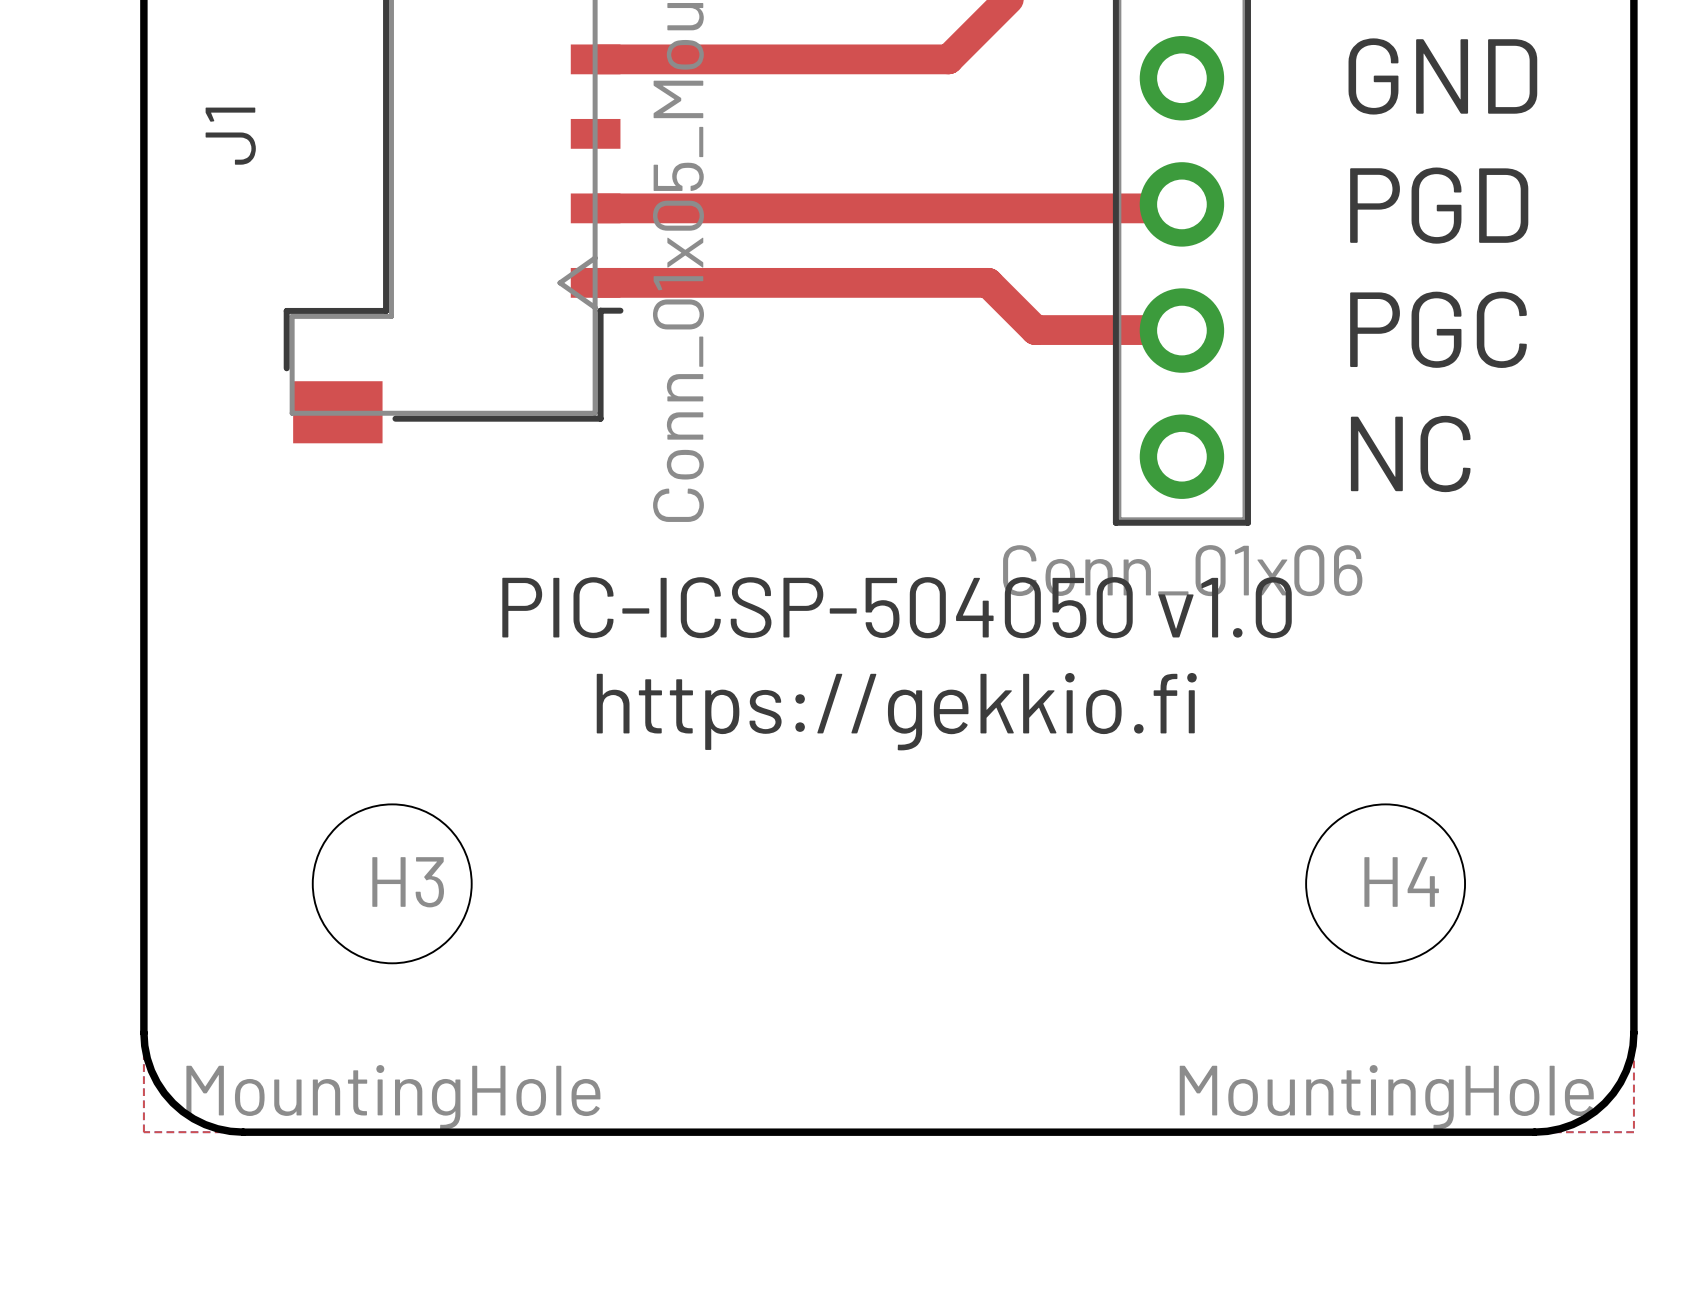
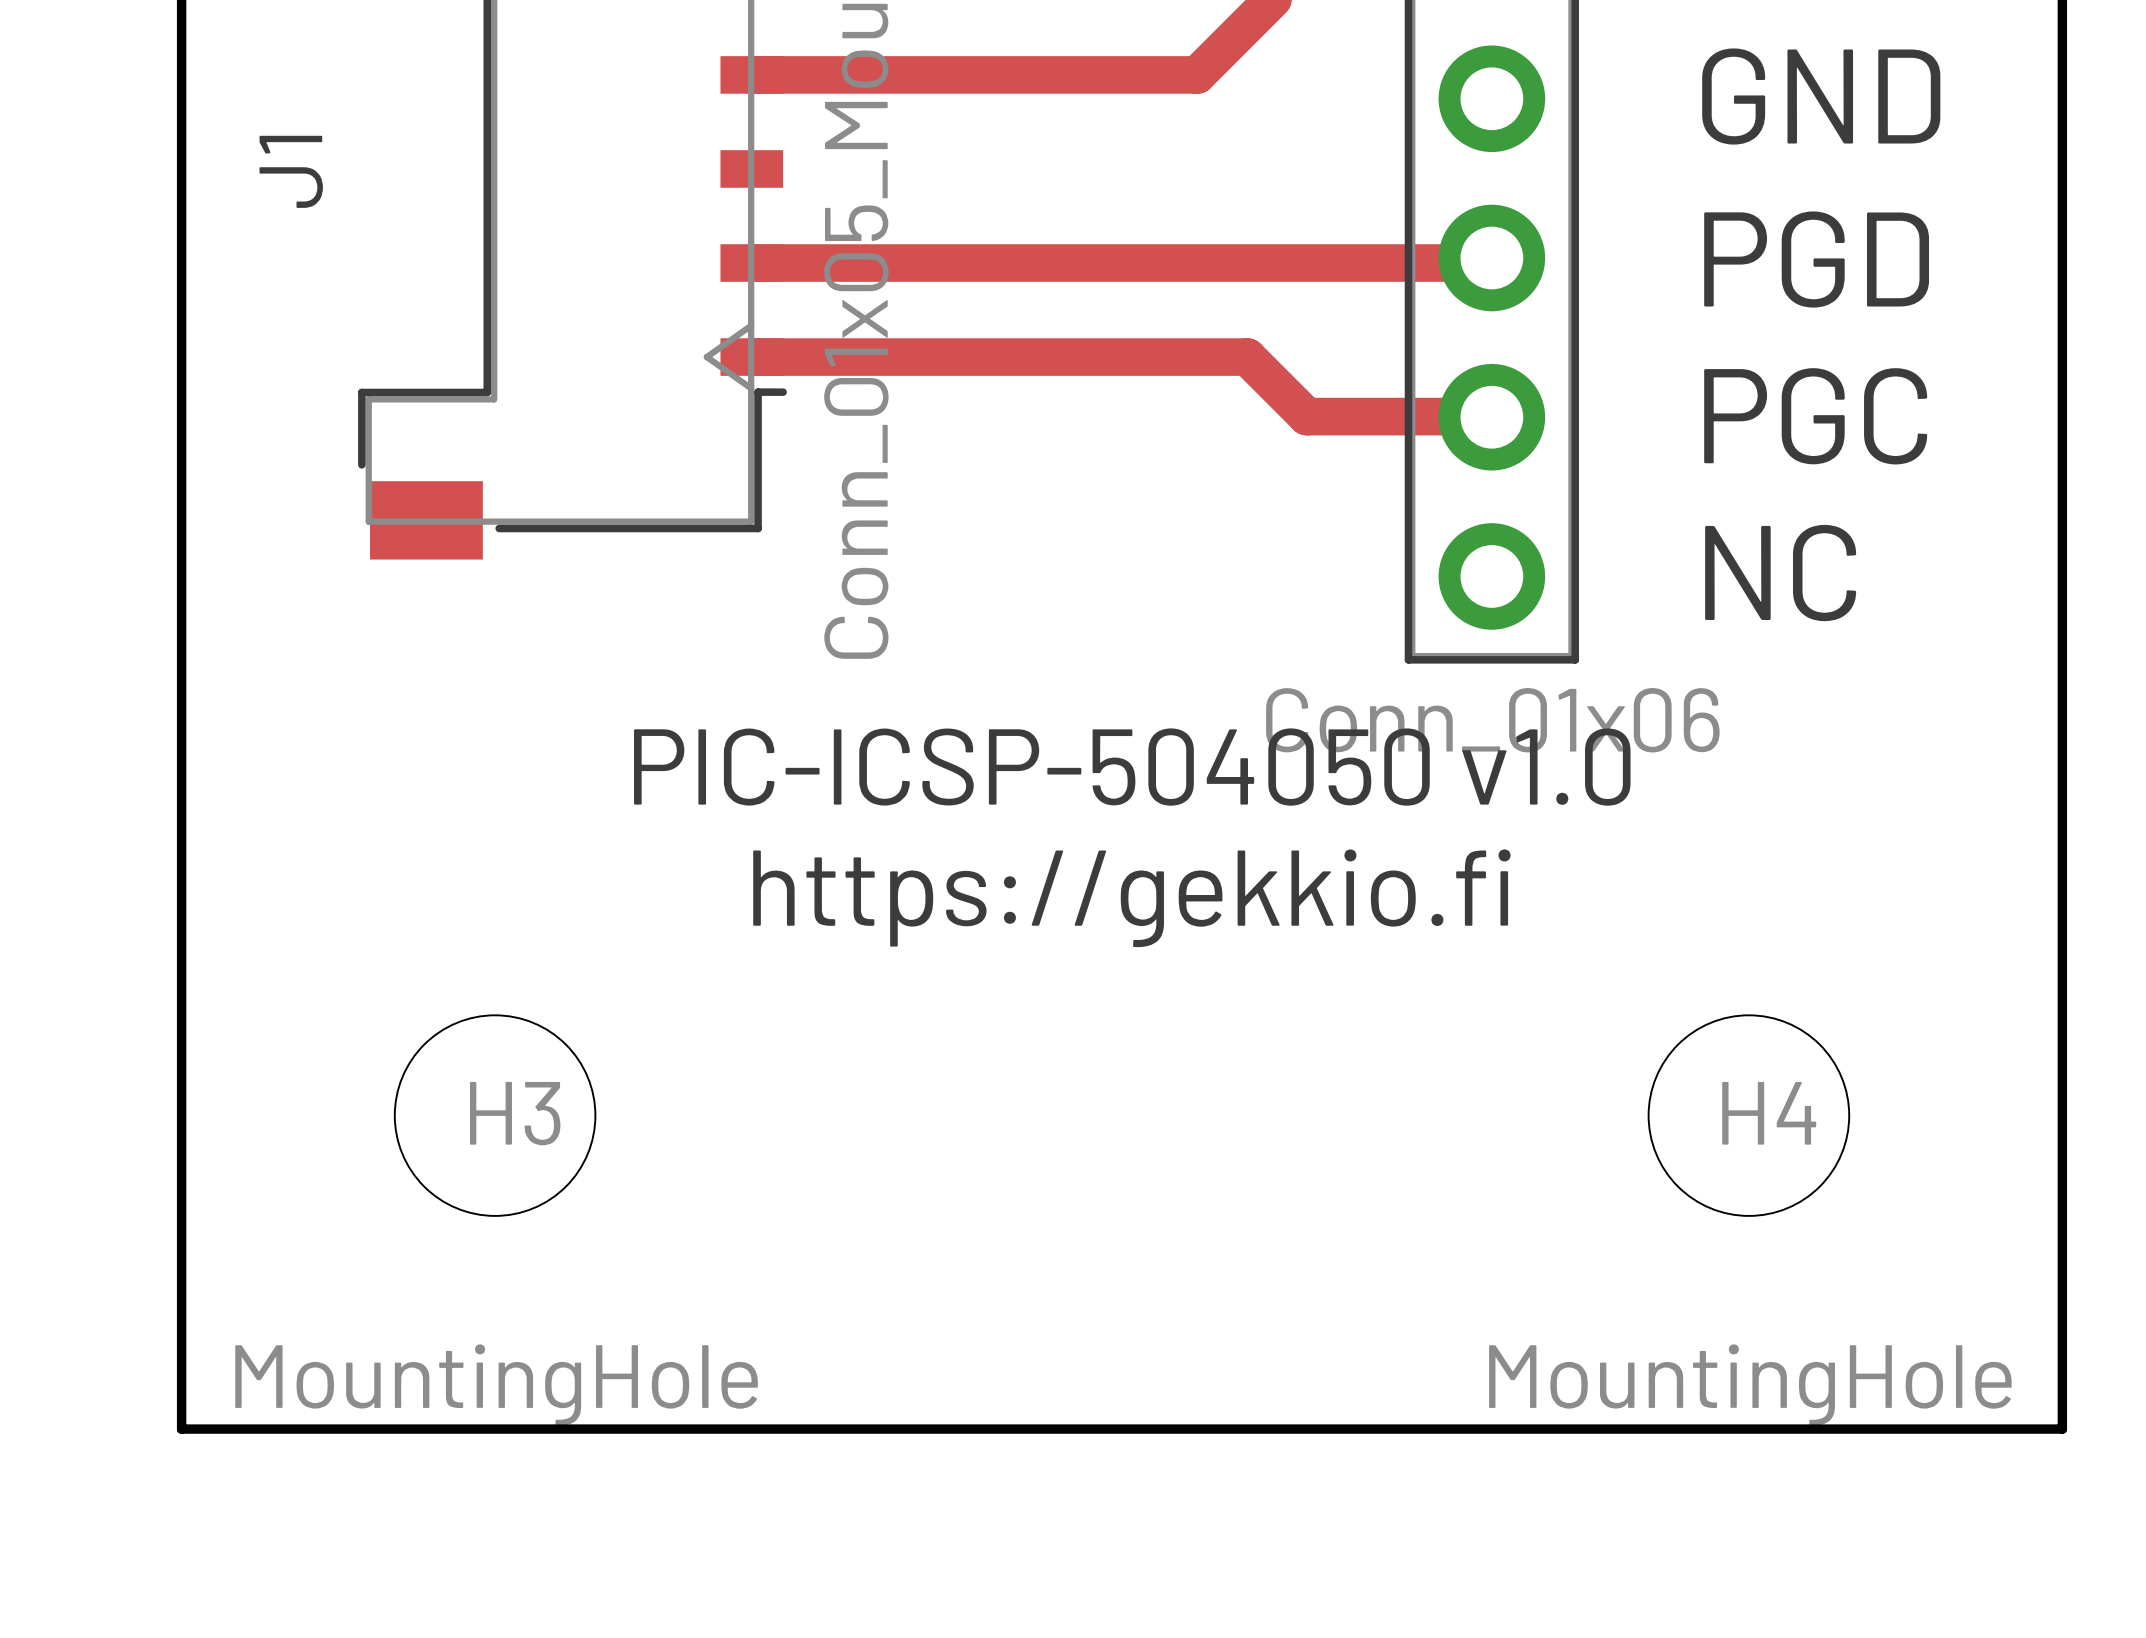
board edge: (143, 1032) (147, 1058) (151, 1070) (164, 1093) (172, 1103) (193, 1118) (205, 1124) (217, 1128) (243, 1132) -> (181, 1303) (181, 1429) (307, 1429)
board edge: (1633, 1032) (1630, 1058) (1626, 1070) (1620, 1082) (1604, 1103) (1584, 1118) (1572, 1124) (1560, 1128) (1534, 1132) -> (2062, 1303) (2062, 1429) (1936, 1429)

